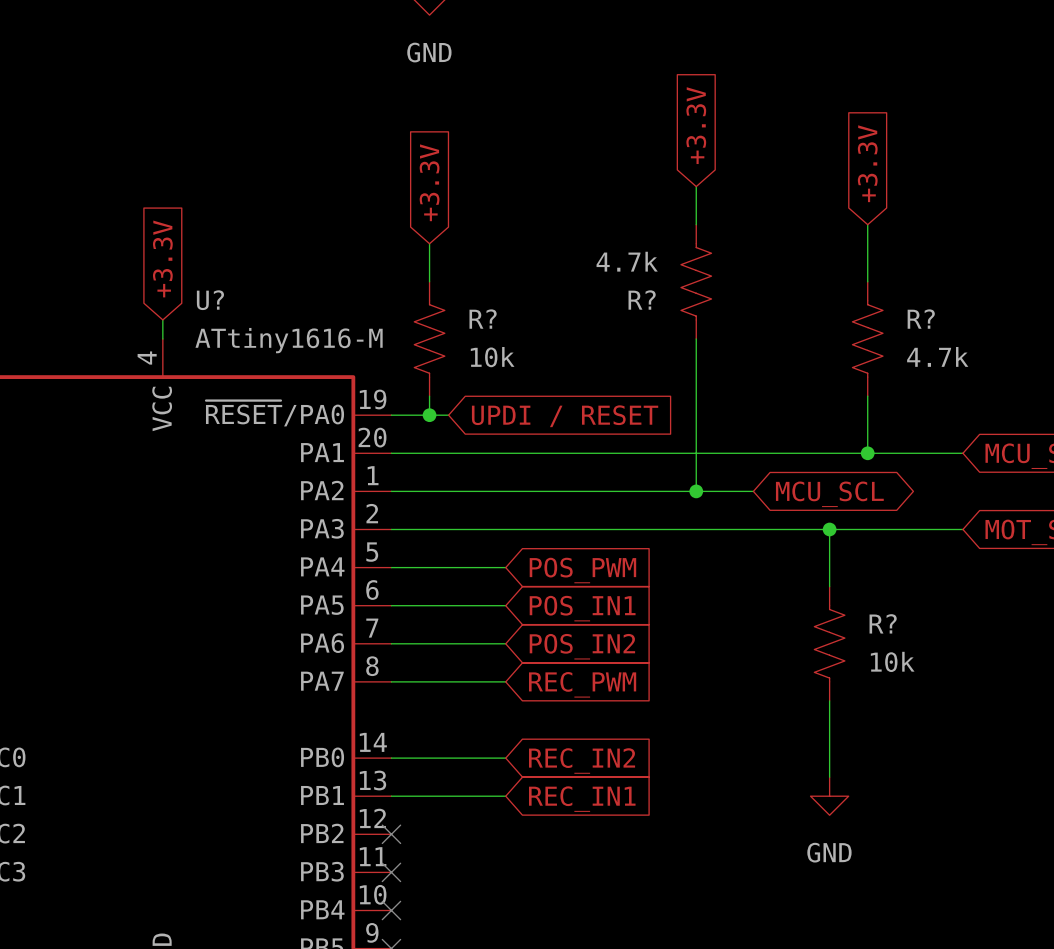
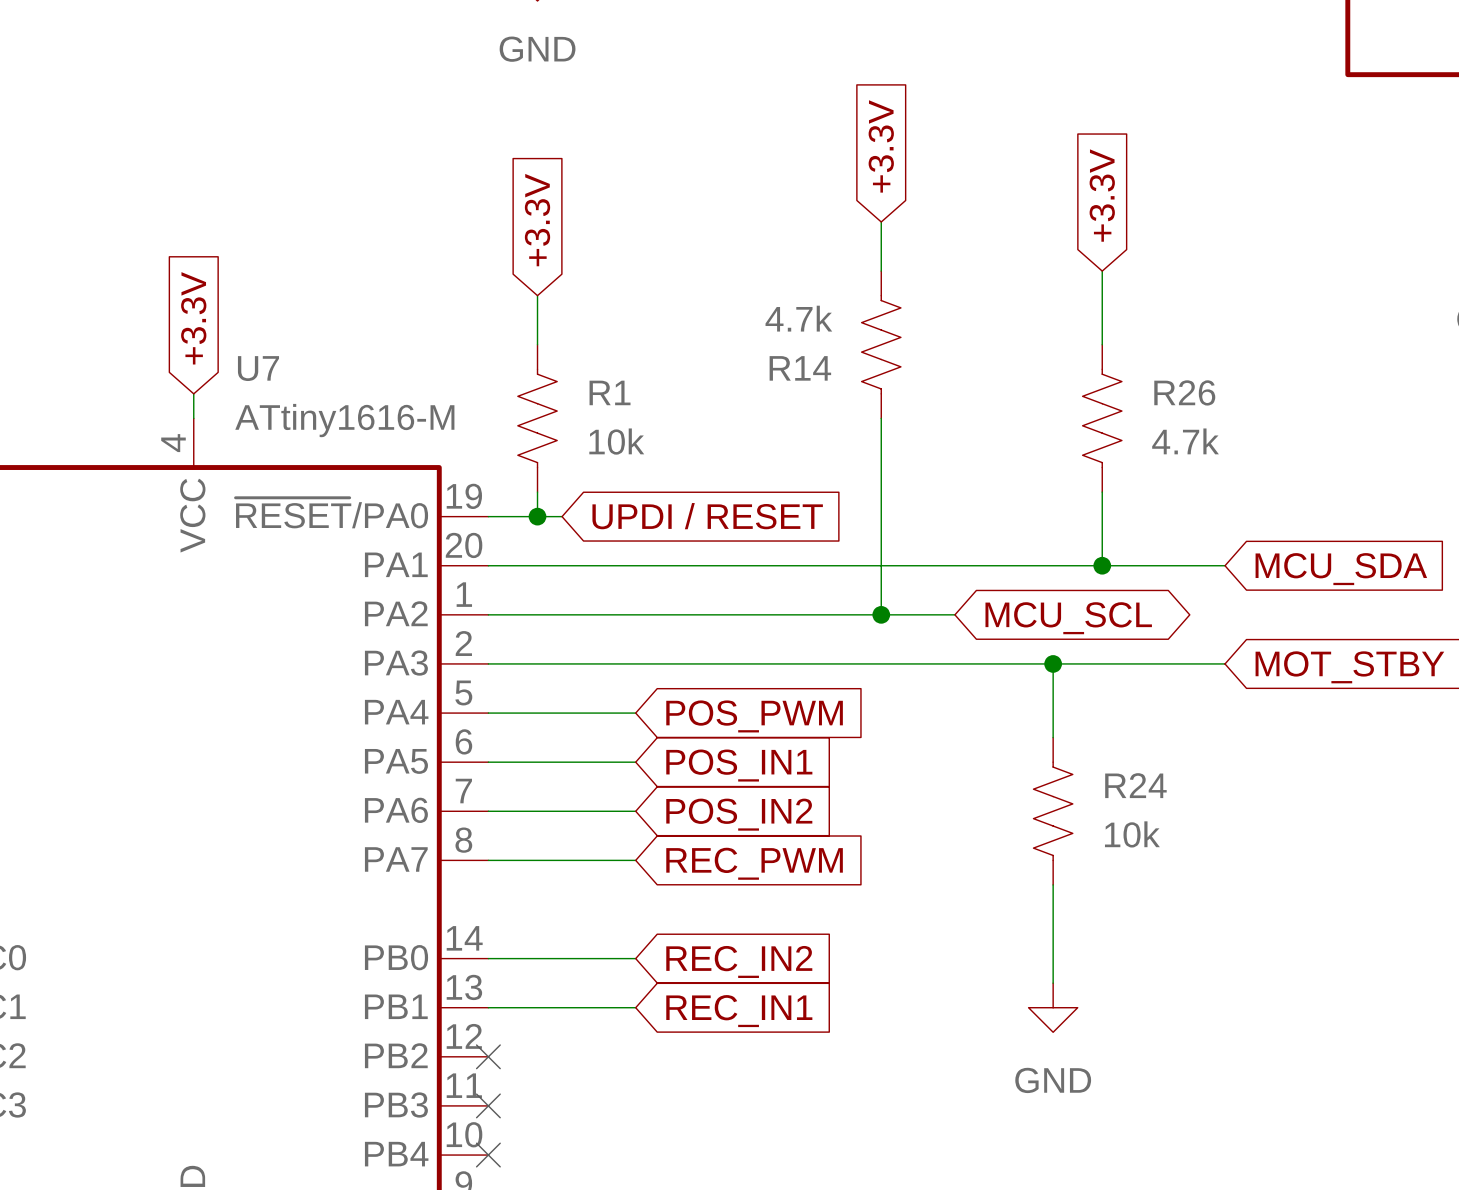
U? name: U? (210, 300) -> U7 (258, 368)
R? name: R? (642, 300) -> R14 (800, 368)
R? name: R? (483, 319) -> R1 (610, 392)
R? name: R? (921, 319) -> R26 (1184, 392)
R? name: R? (883, 623) -> R24 (1135, 785)

